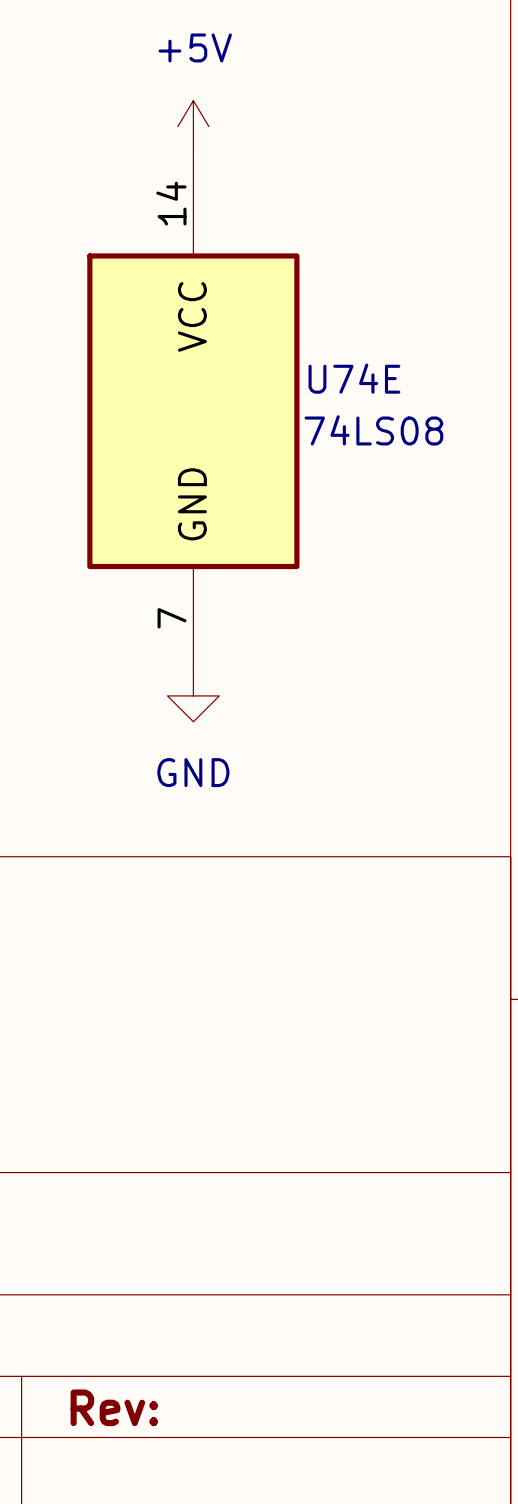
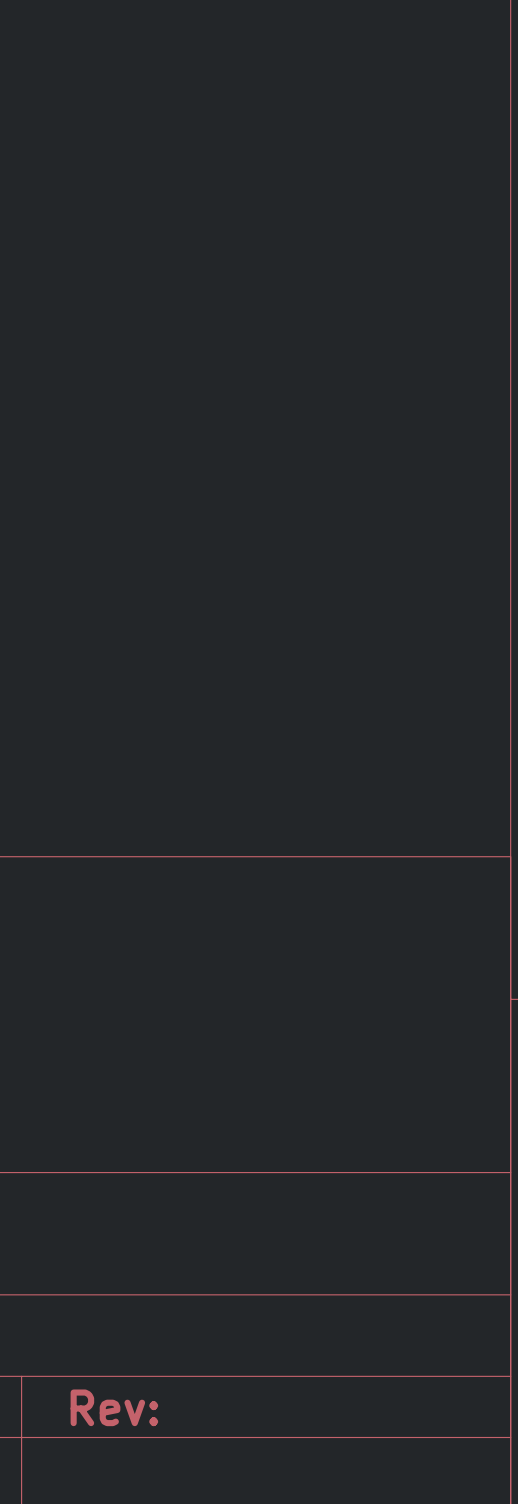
power symbol: +5V (193, 126) -> none
U74E: 74LS08 (193, 411) -> none
power symbol: GND (193, 695) -> none

